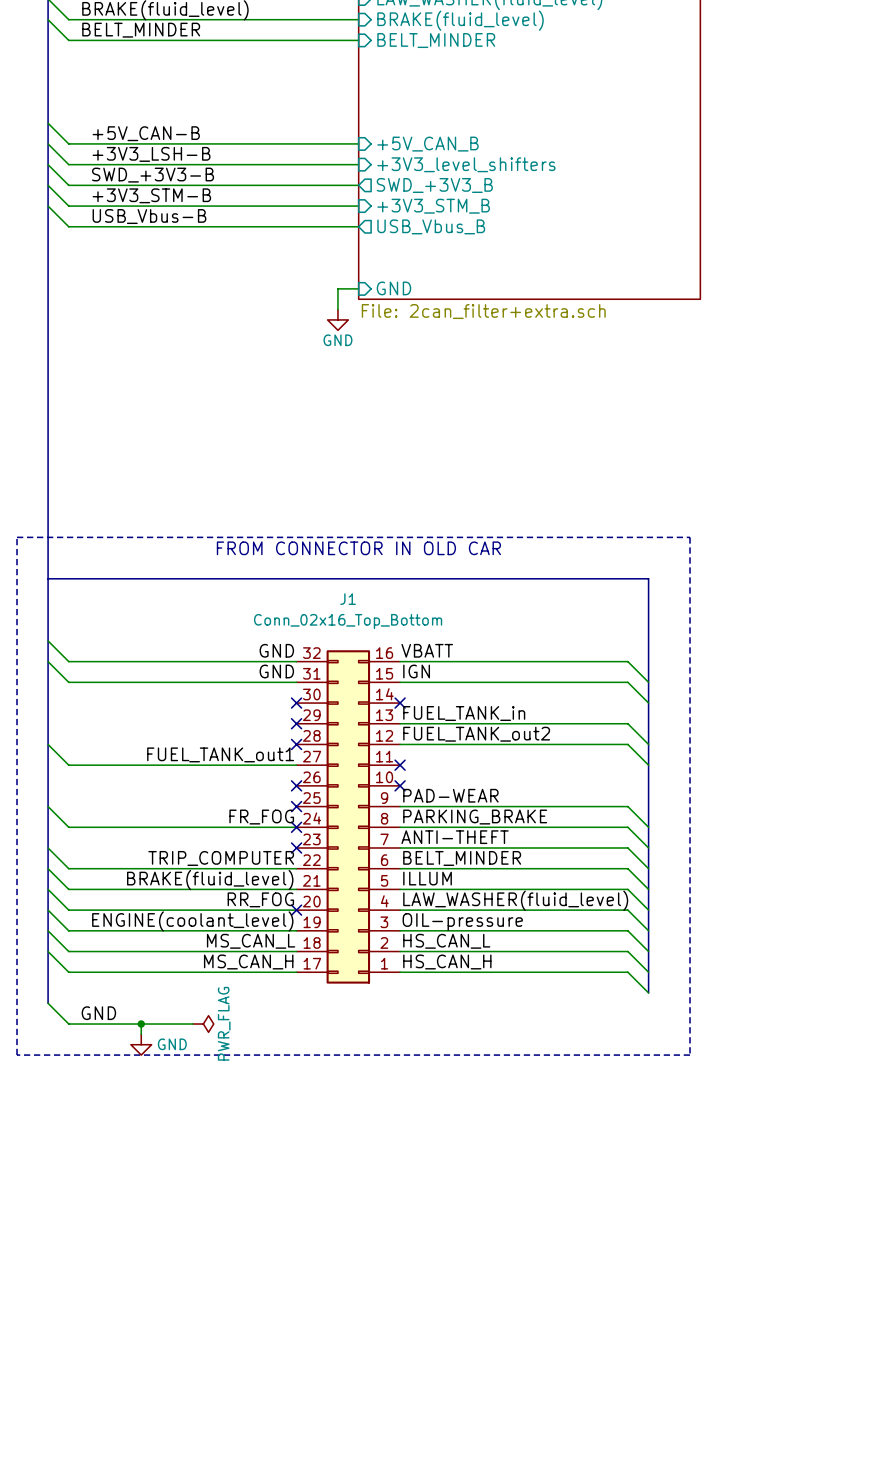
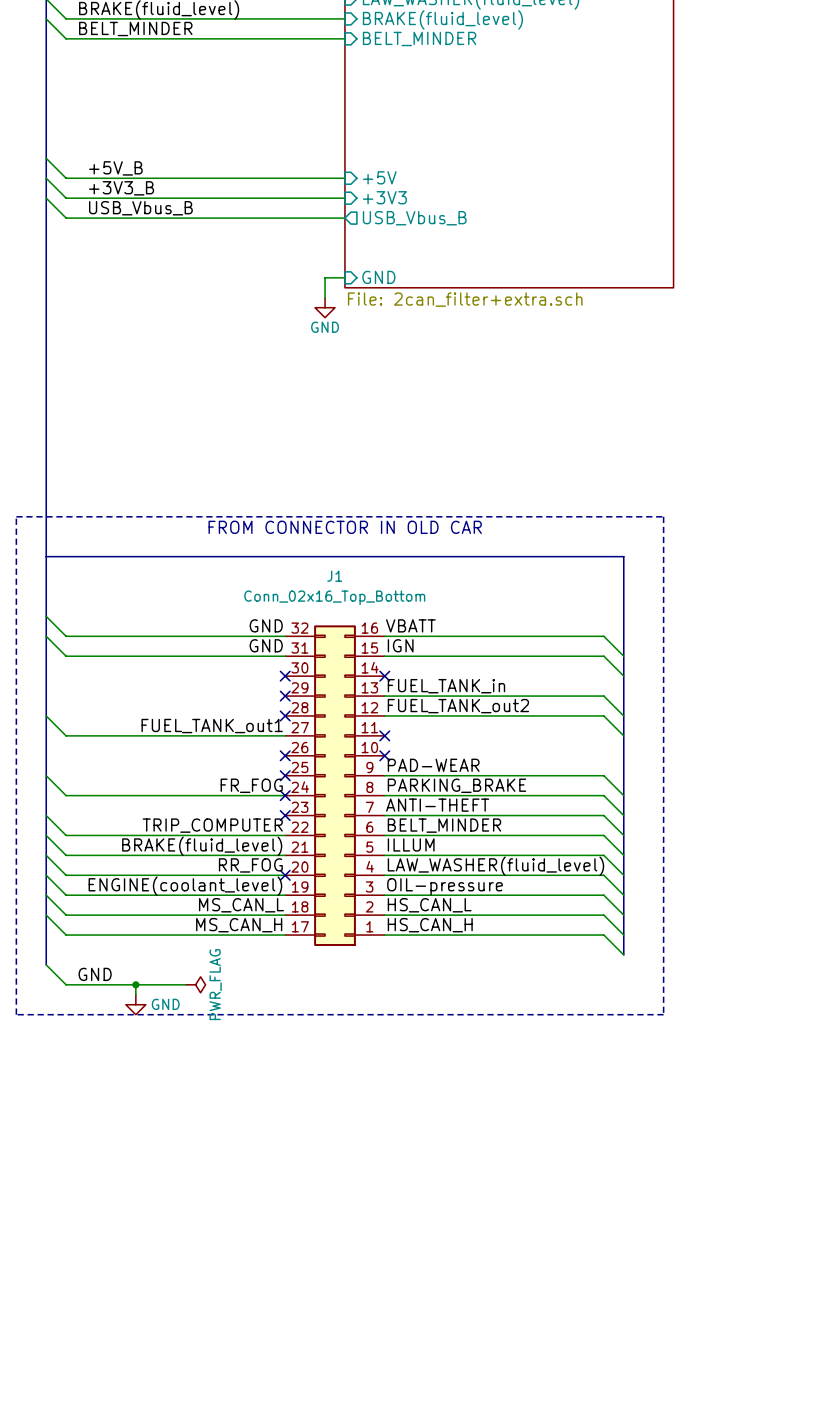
wire: (48, 123) (68, 143) (358, 143) -> none
label: +5V_CAN-B (146, 133) -> none
wire: (48, 143) (68, 164) (358, 164) -> none
sheet pin: +5V_CAN_B (427, 144) -> none
label: +3V3_LSH-B (151, 154) -> none
sheet pin: +3V3_level_shifters (466, 164) -> none
label: SWD_+3V3-B (153, 175) -> +5V_B (115, 168)
sheet pin shape: output (434, 185) -> input (379, 177)
sheet pin: SWD_+3V3_B (434, 185) -> +5V (379, 177)
label: +3V3_STM-B (151, 195) -> +3V3_B (121, 188)
sheet pin: +3V3_STM_B (433, 206) -> +3V3 (384, 197)
label: USB_Vbus-B (149, 216) -> USB_Vbus_B (140, 208)

